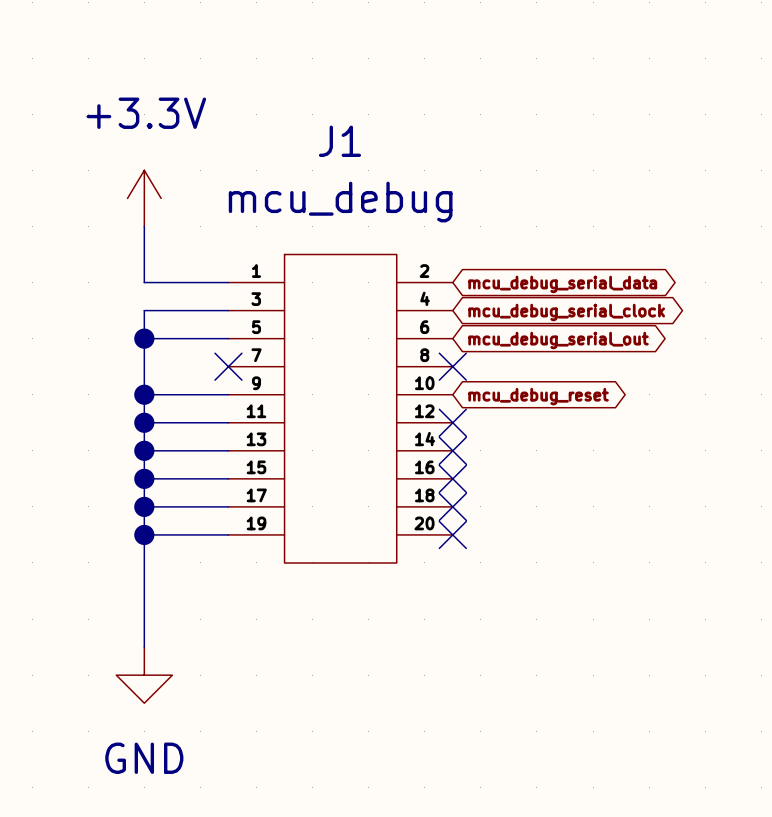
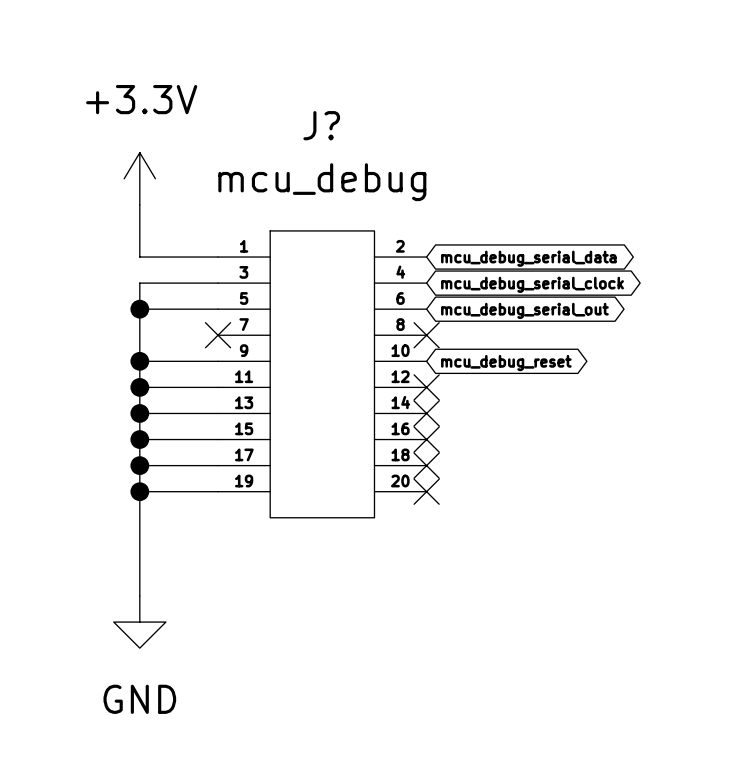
J1 name: J1 (339, 141) -> J? (321, 125)

